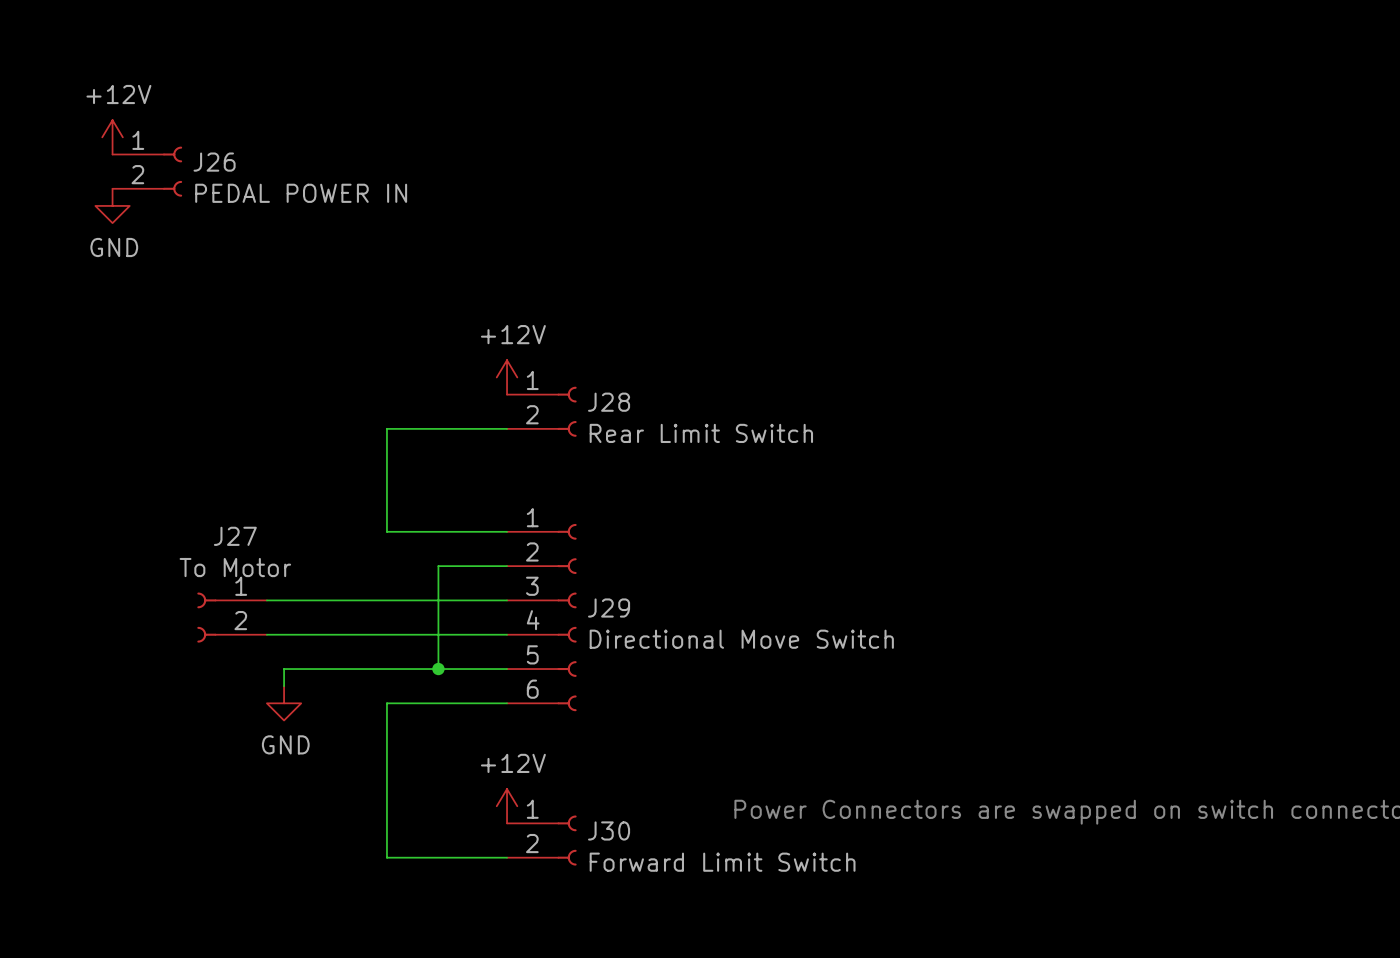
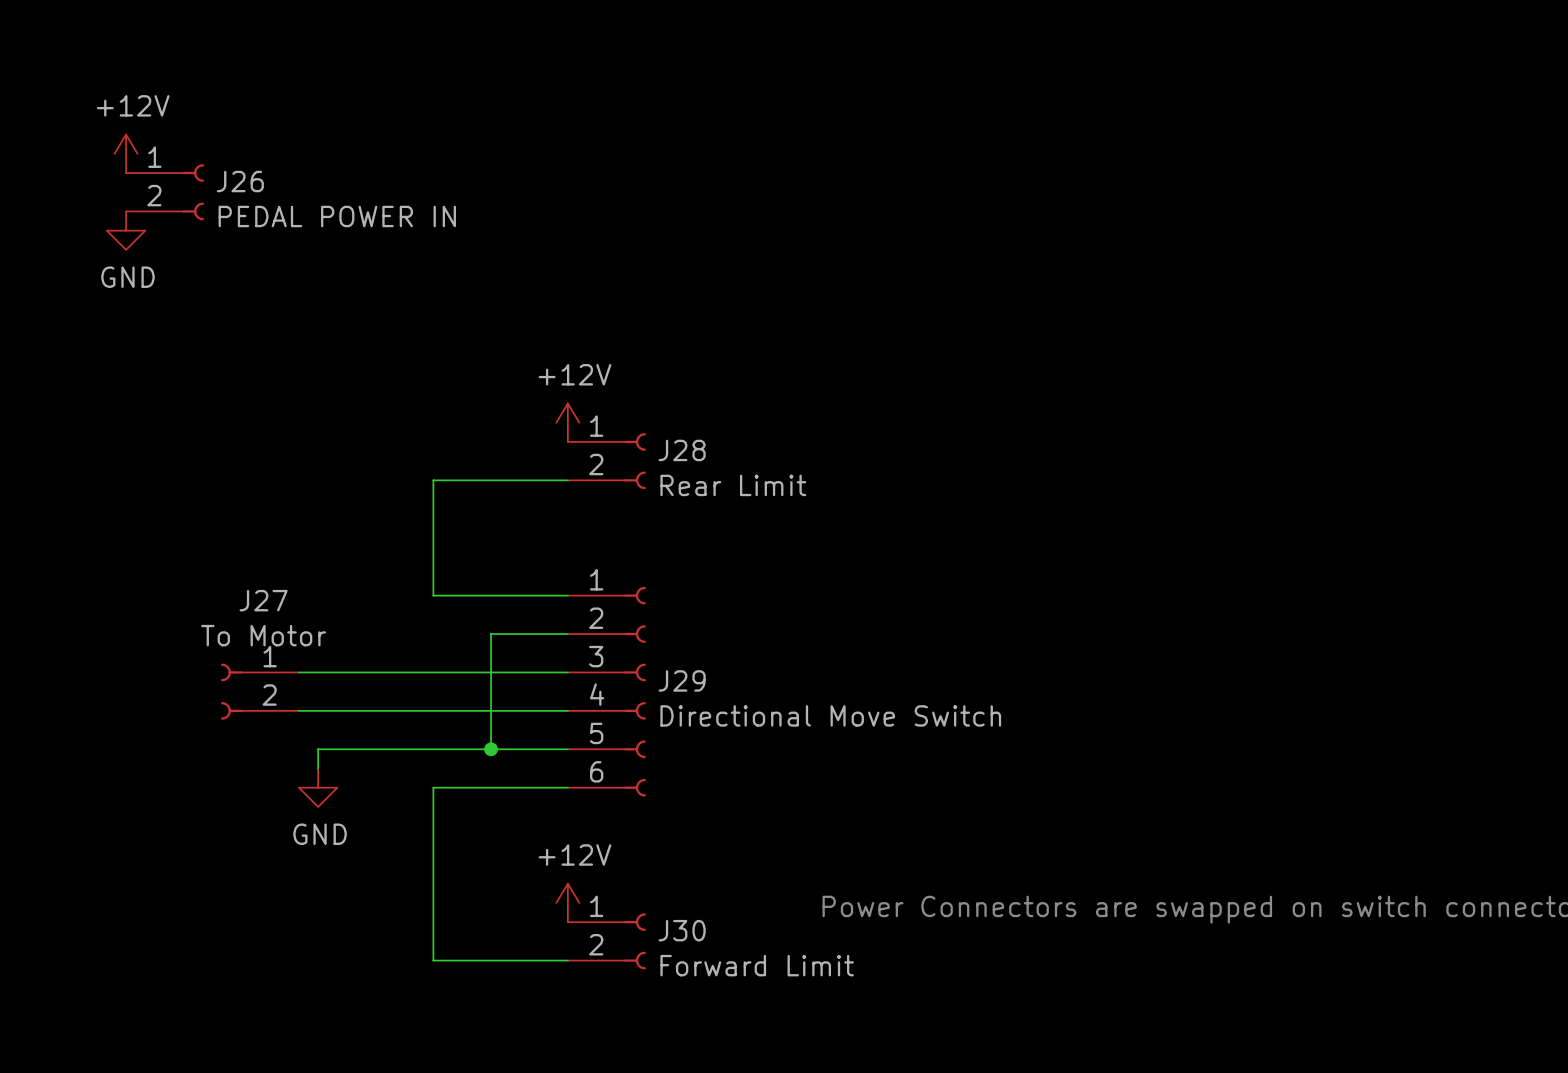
J28 value: Rear Limit Switch (701, 433) -> Rear Limit (733, 485)
J30 value: Forward Limit Switch (722, 862) -> Forward Limit (757, 965)

